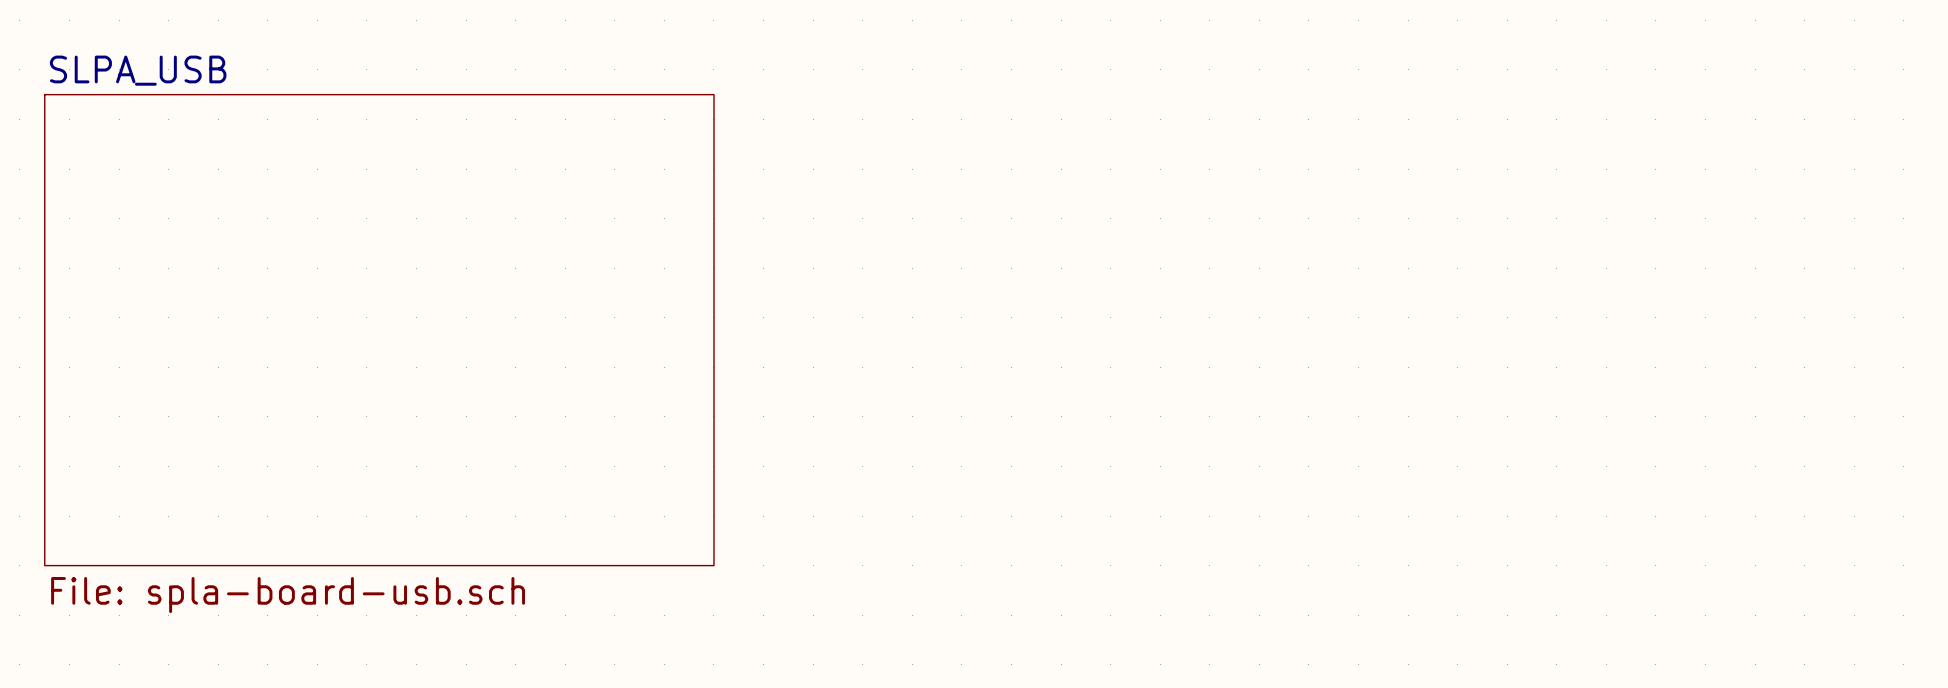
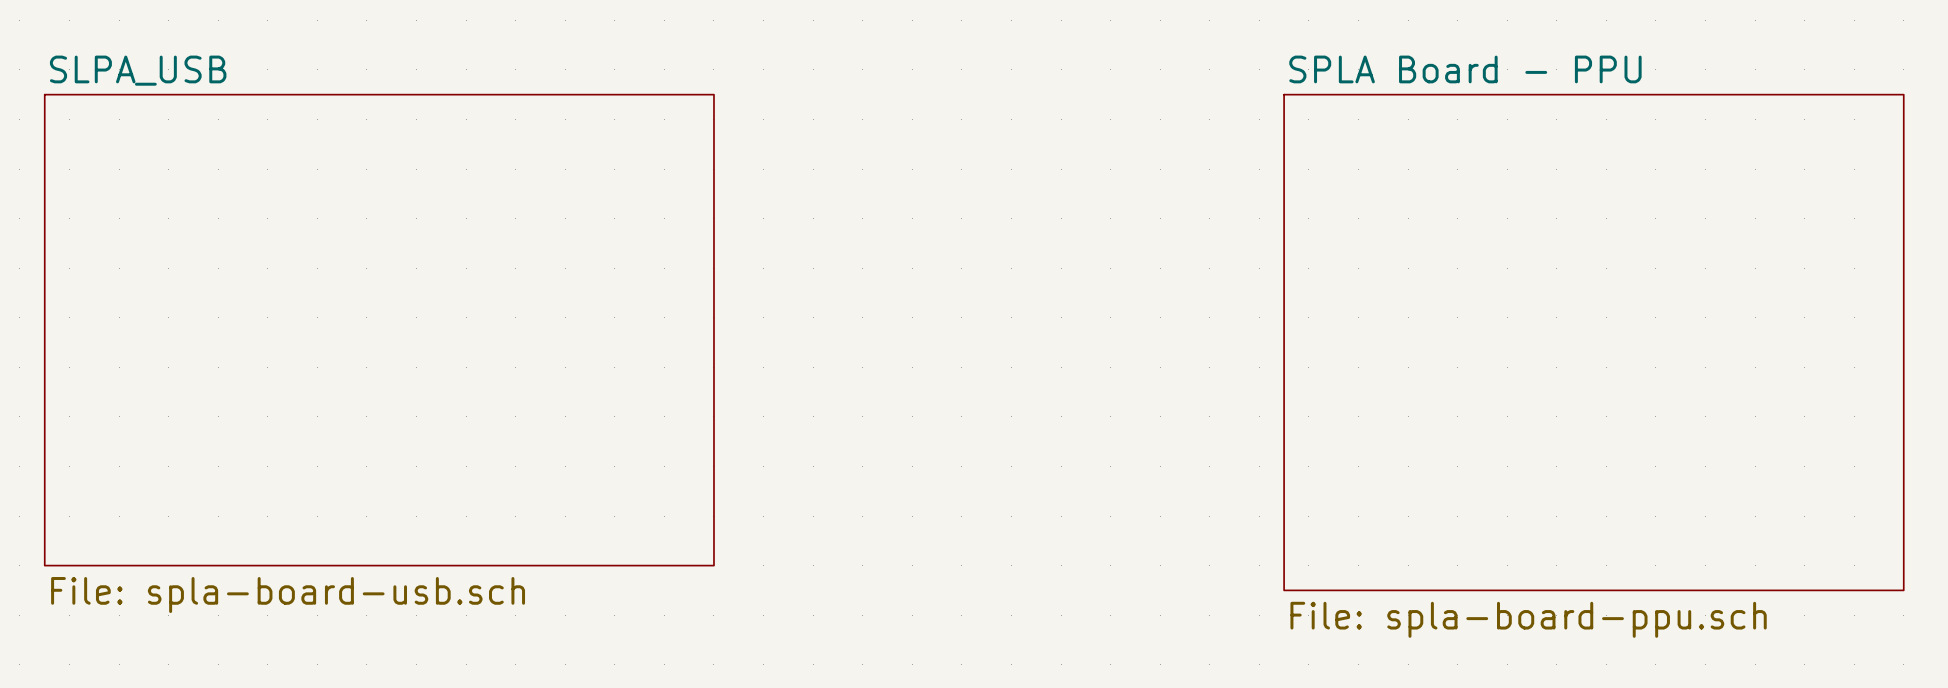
sheet SPLA Board - PPU: none -> File: spla-board-ppu.sch (1593, 342)

